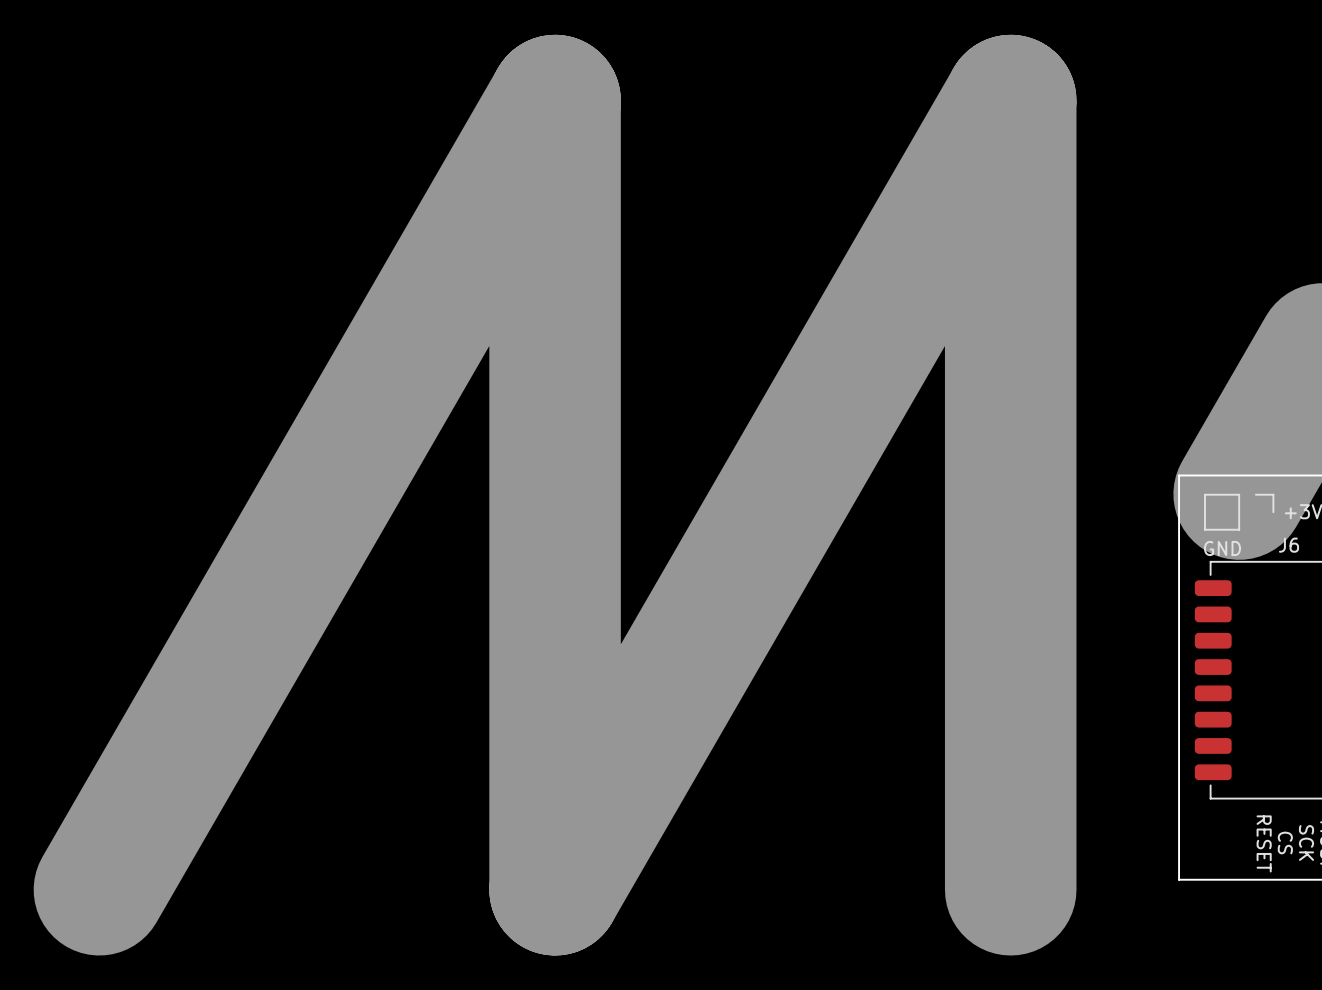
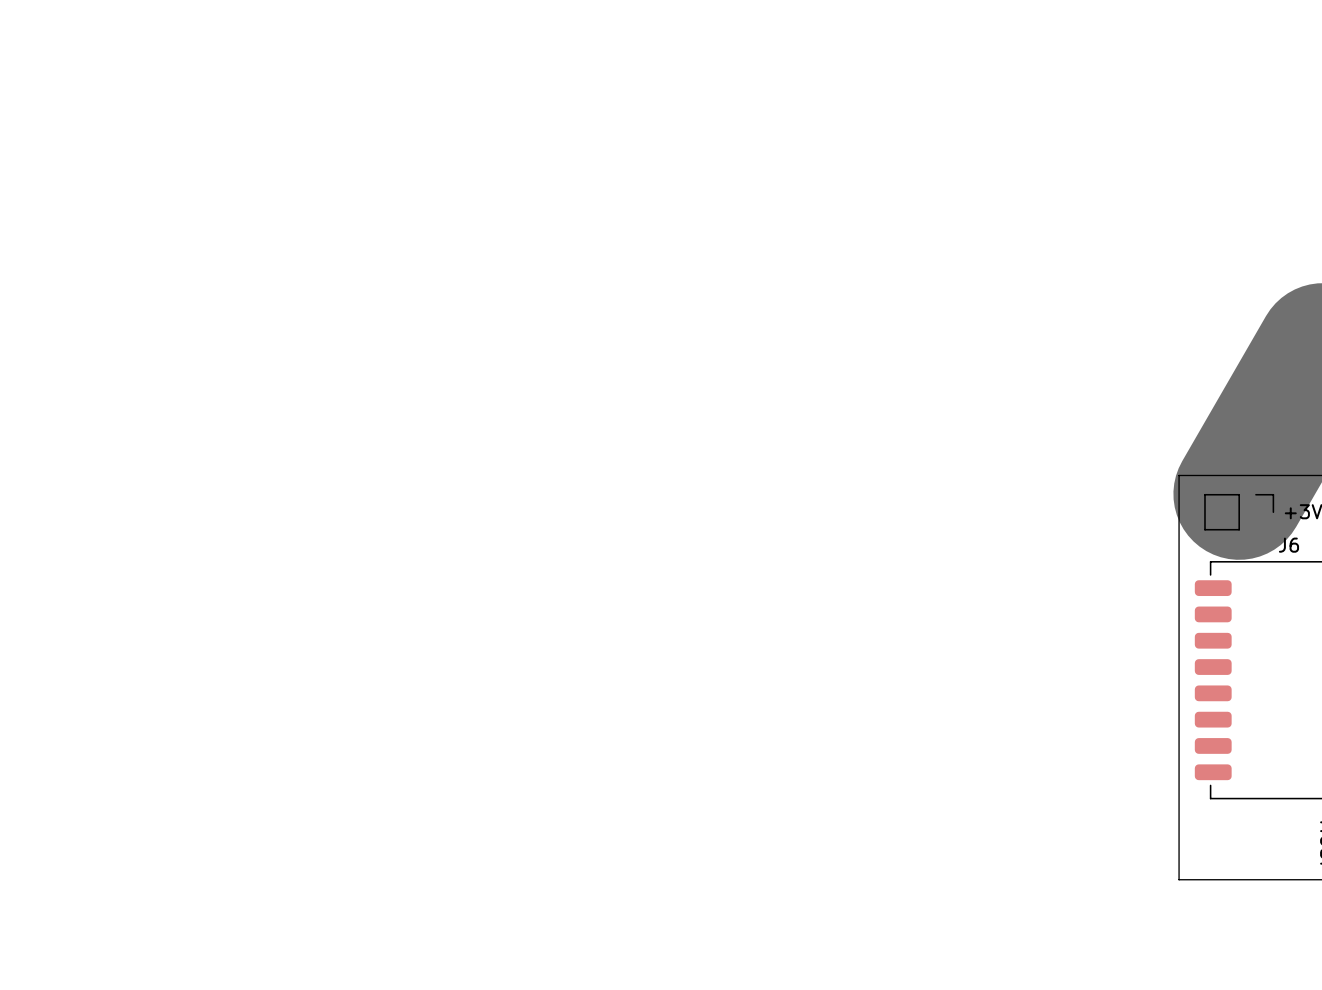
text: GND (1222, 548) -> none
text: CS (1285, 842) -> none
text: SCK (1306, 842) -> none
text: RESET (1264, 843) -> none
line: (99, 889) (555, 100) (555, 889) (1010, 100) (1010, 889) -> none

